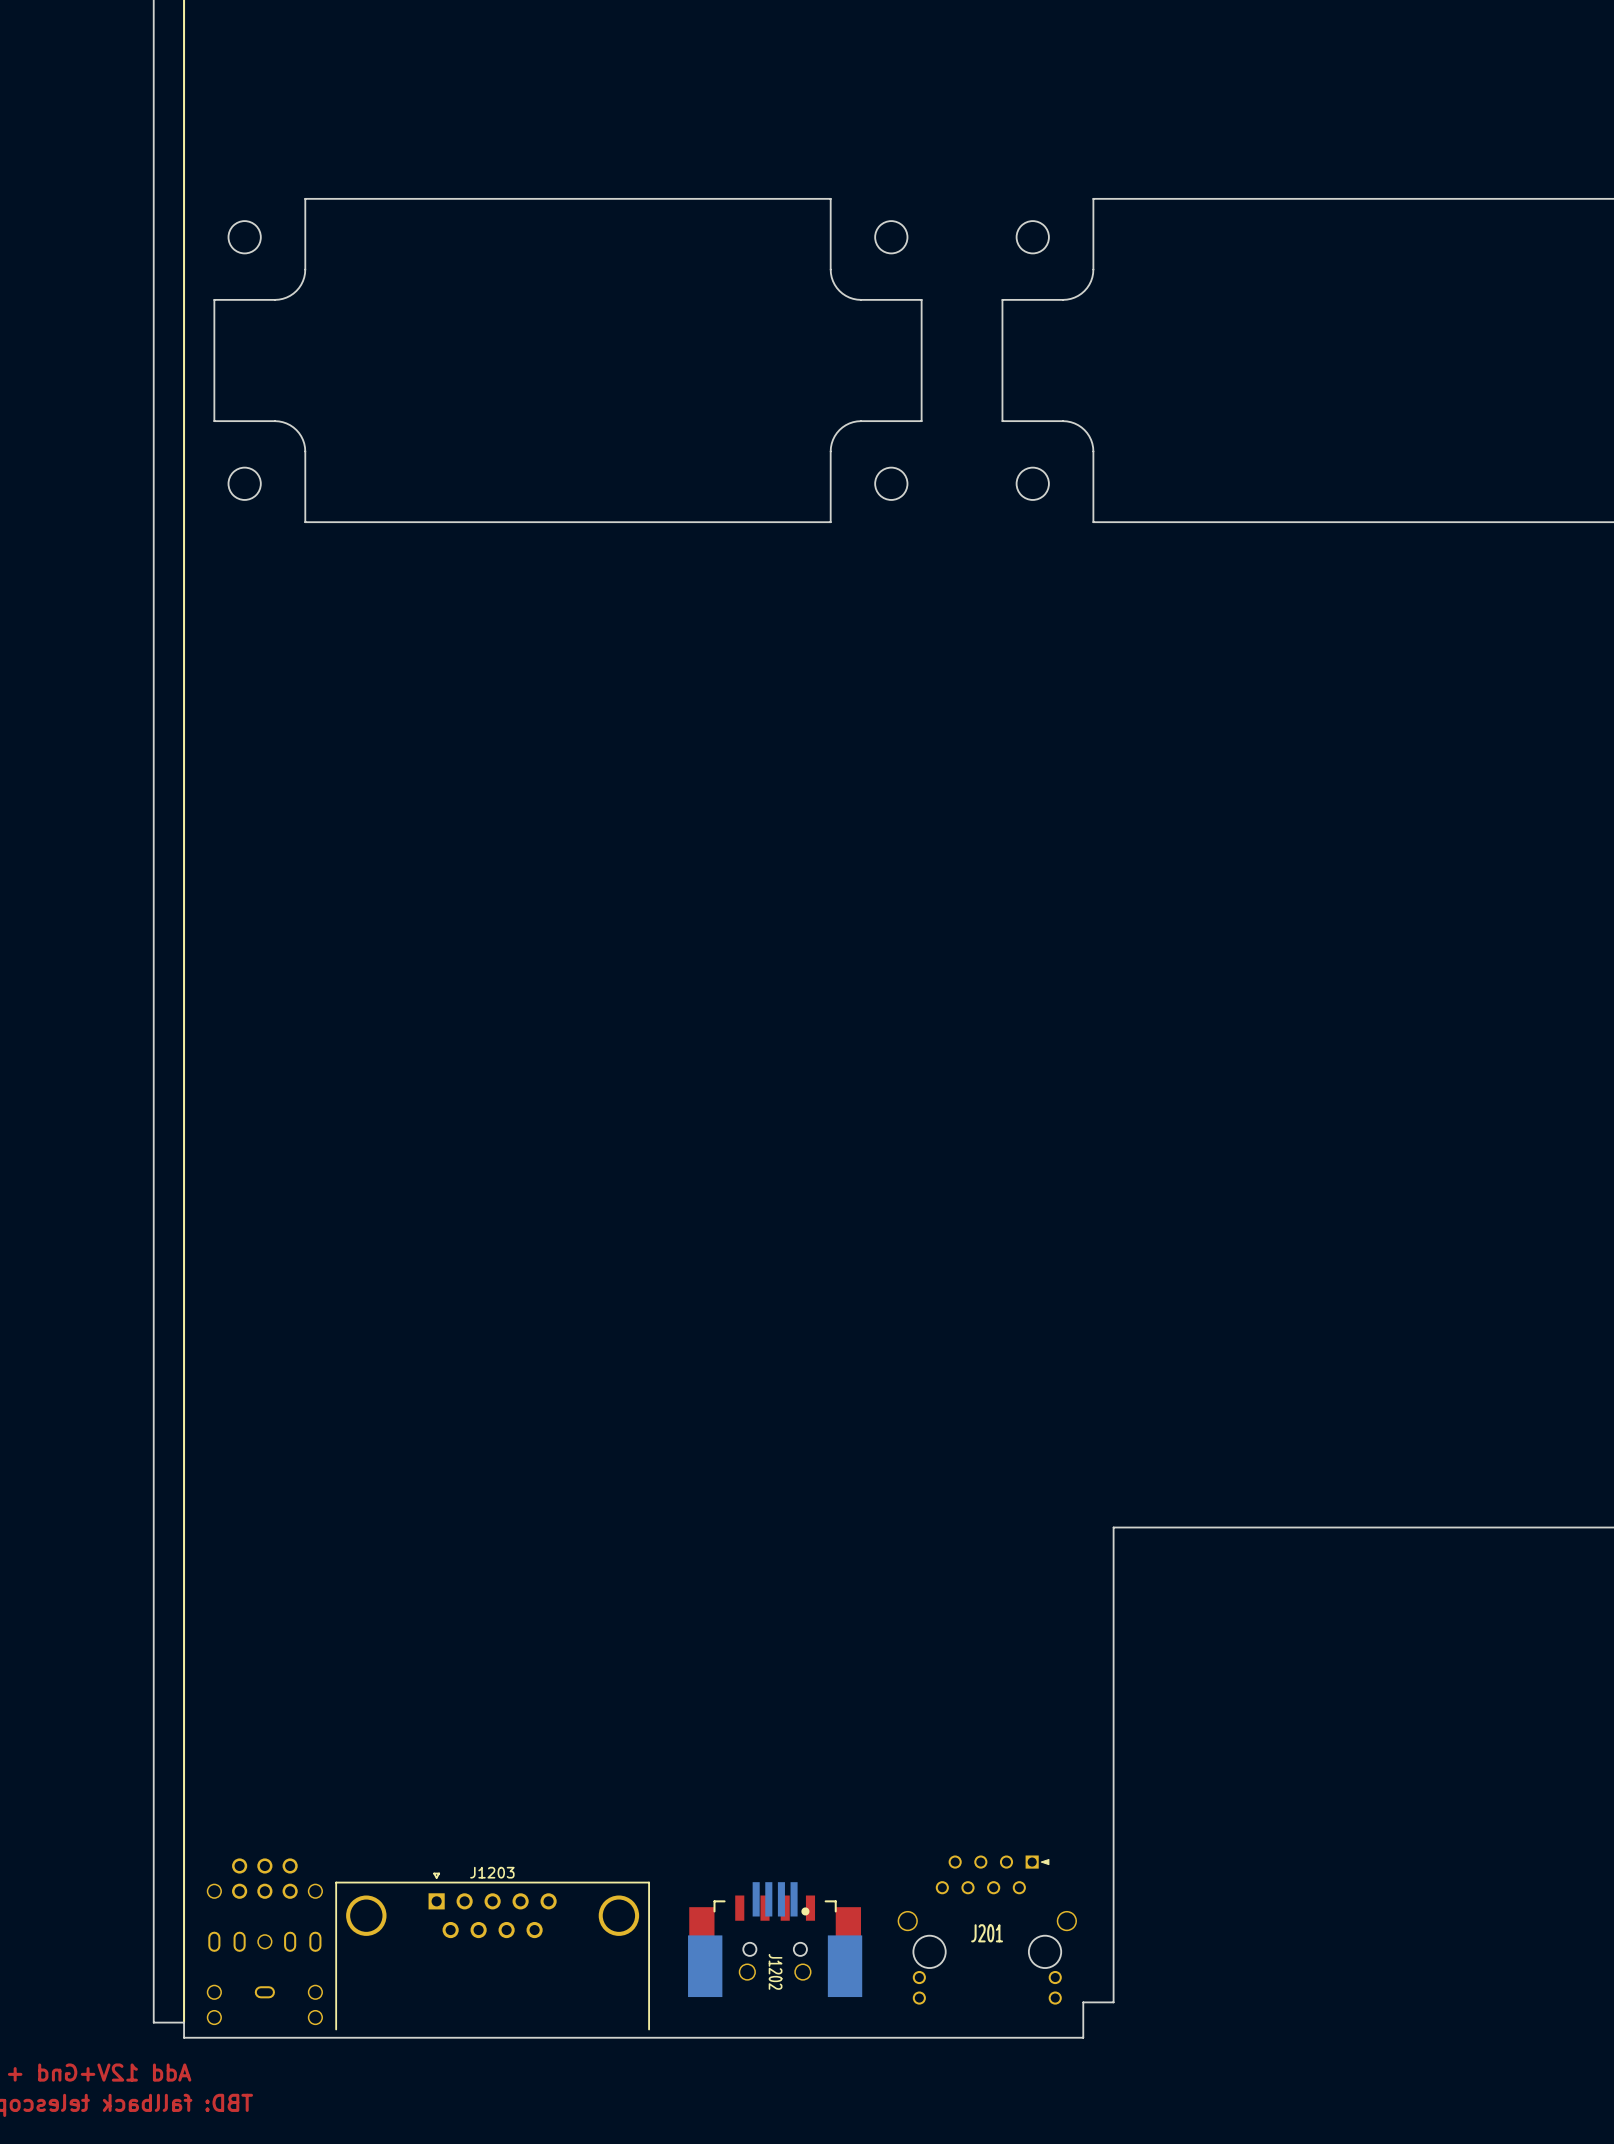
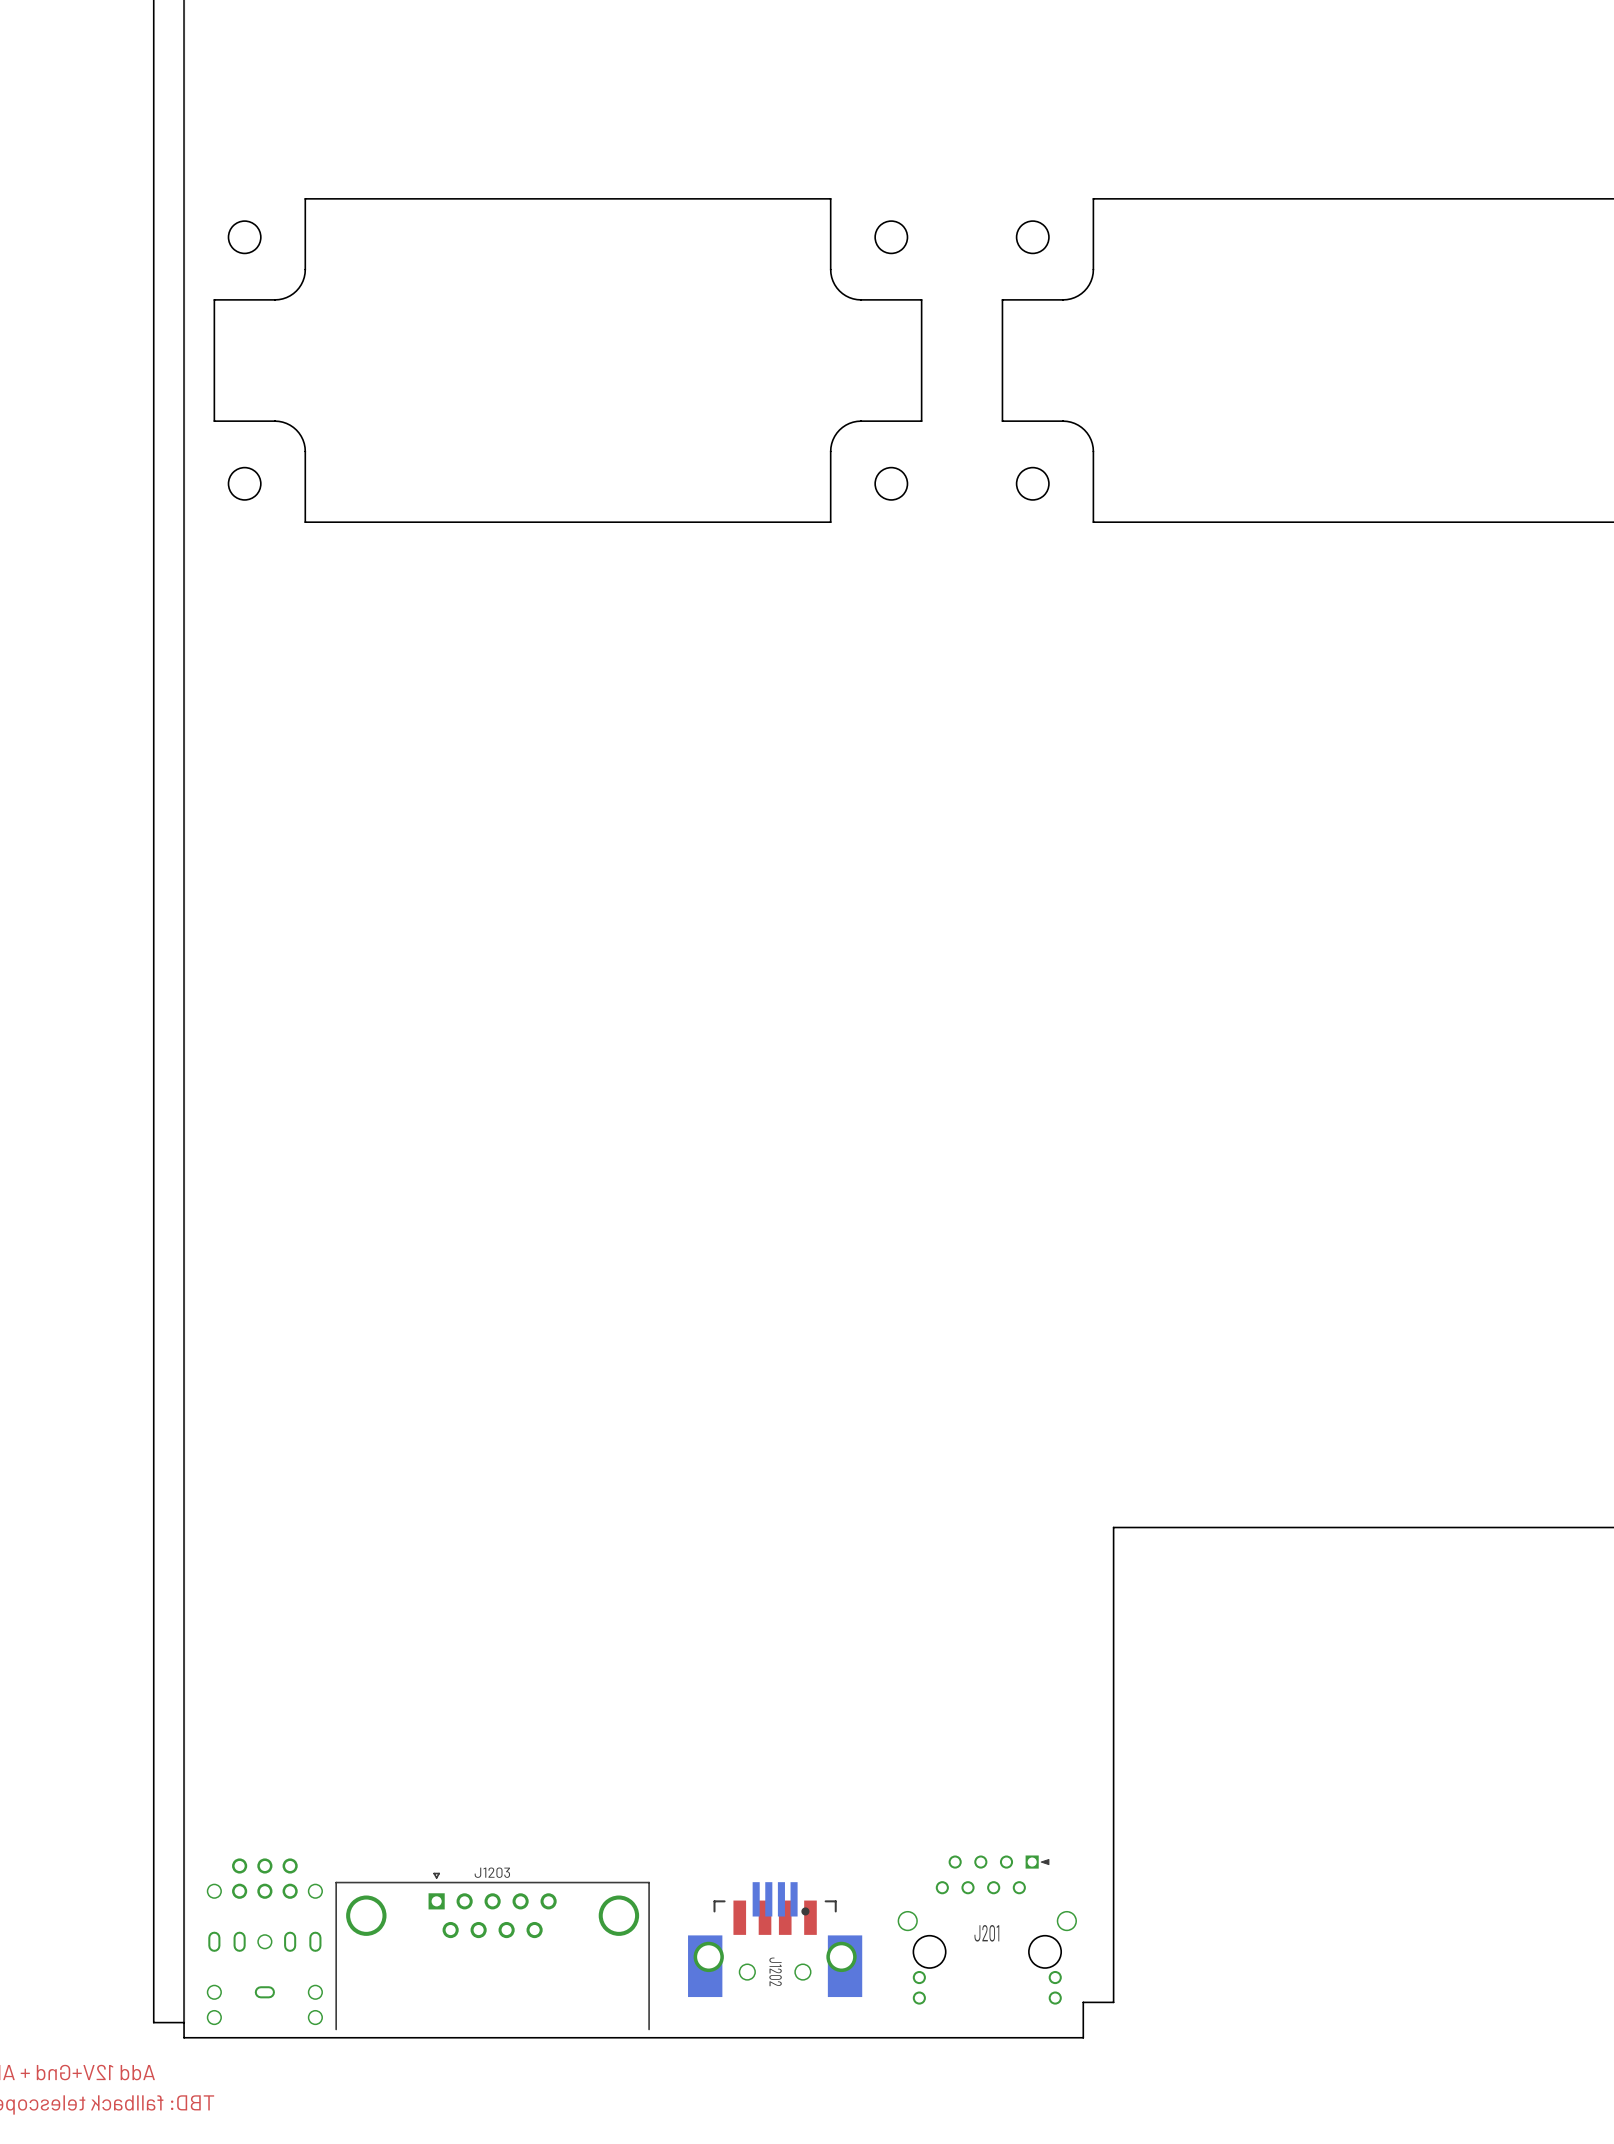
part footprint: [689, 1895, 862, 1960] -> [693, 1900, 857, 1973]

